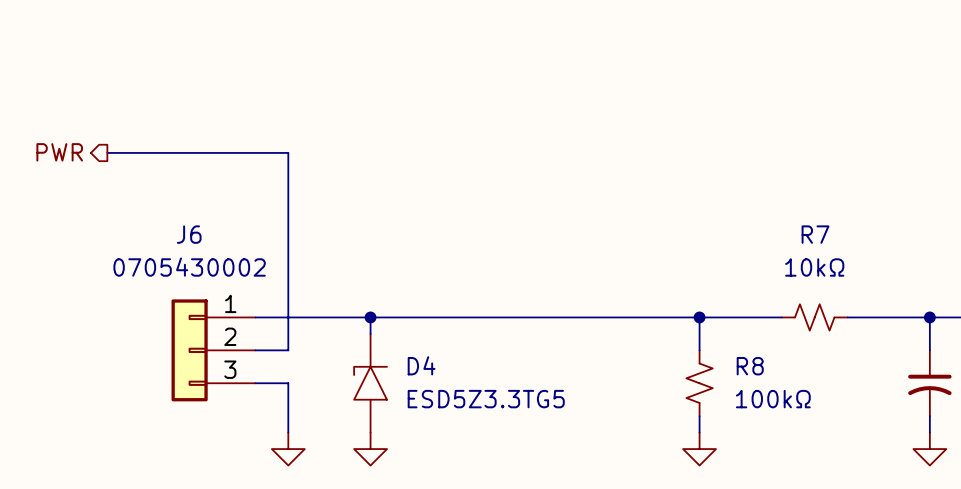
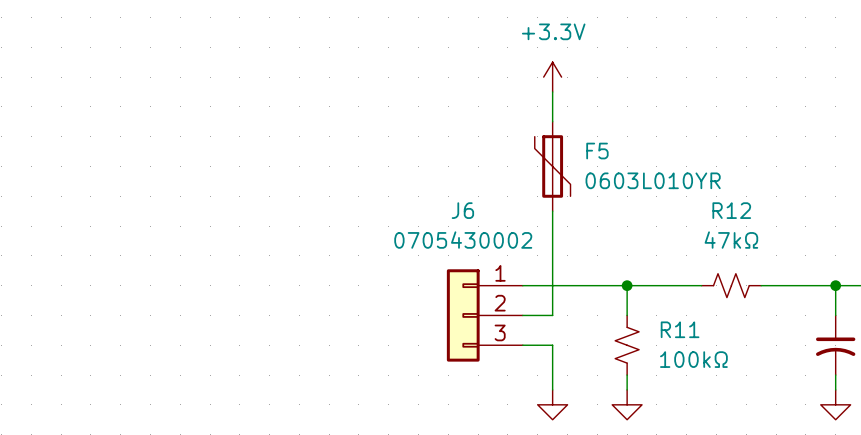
power symbol: none -> +3.3V (552, 77)
wire: none -> (552, 91) (552, 121)
hierarchical label: PWR (59, 152) -> none
wire: (107, 152) (288, 152) (288, 350) (255, 350) -> none
F5: none -> 0603L010YR (552, 166)
R7 name: R7 (815, 234) -> R12 (731, 210)
wire: none -> (552, 211) (552, 315) (522, 315)
R7 value: 10kΩ (814, 267) -> 47kΩ (731, 240)
wire: (255, 317) (584, 317) -> none
wire: (370, 317) (370, 333) -> none
junction: (370, 317) -> none
J6 position: (213, 350) -> (484, 315)
R8 name: R8 (750, 366) -> R11 (680, 329)
wire: (255, 383) (288, 383) (288, 432) -> none
D4: ESD5Z3.3TG5 (370, 383) -> none
wire: none -> (522, 345) (552, 345) (552, 389)
power symbol: (288, 449) -> none
power symbol: (370, 449) -> none
power symbol: none -> (552, 404)

